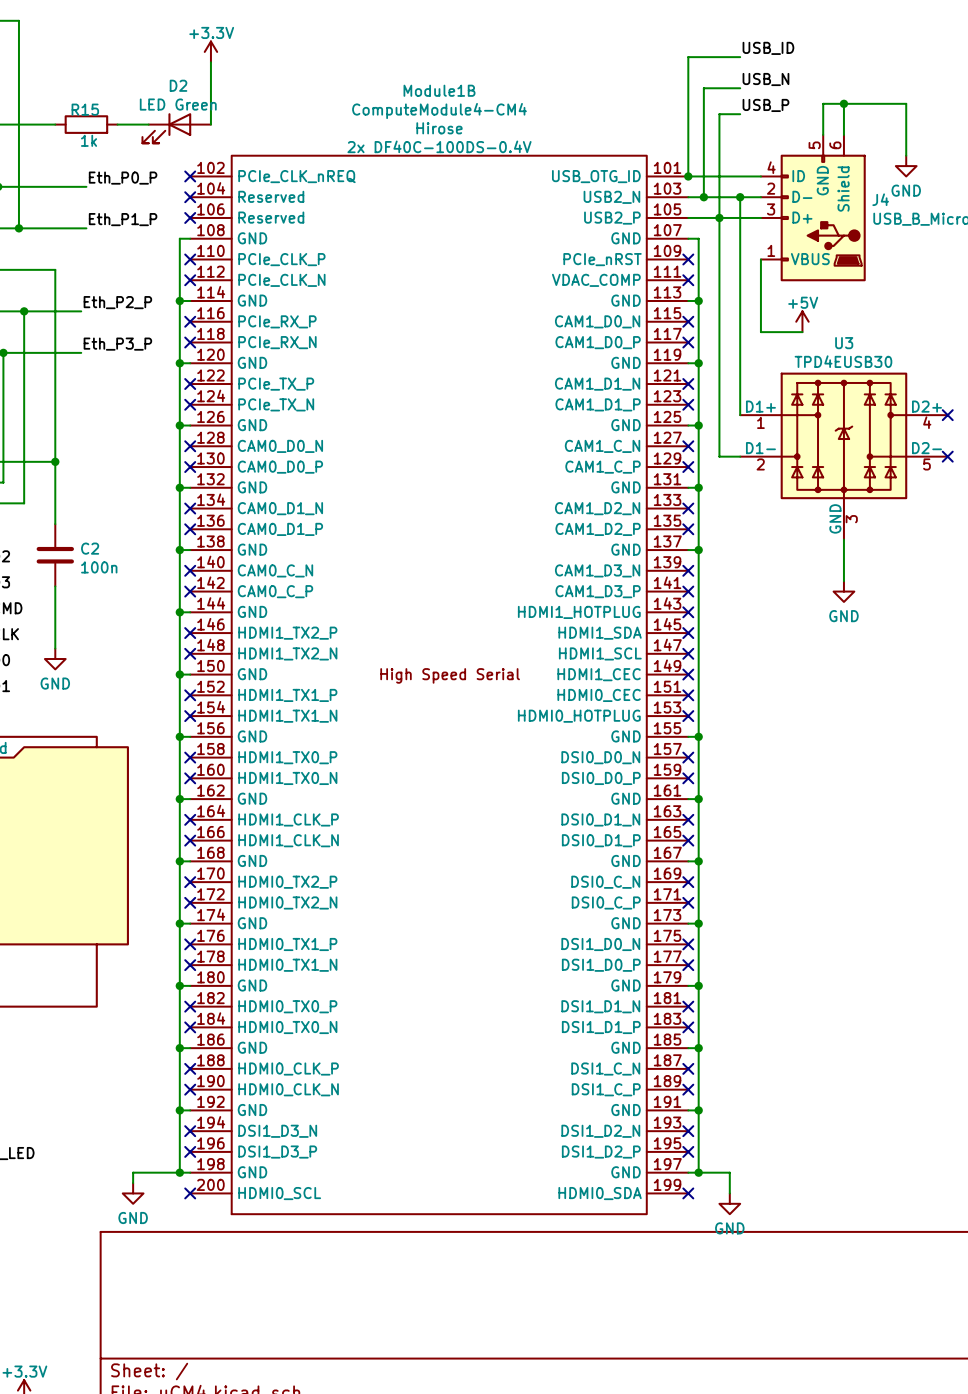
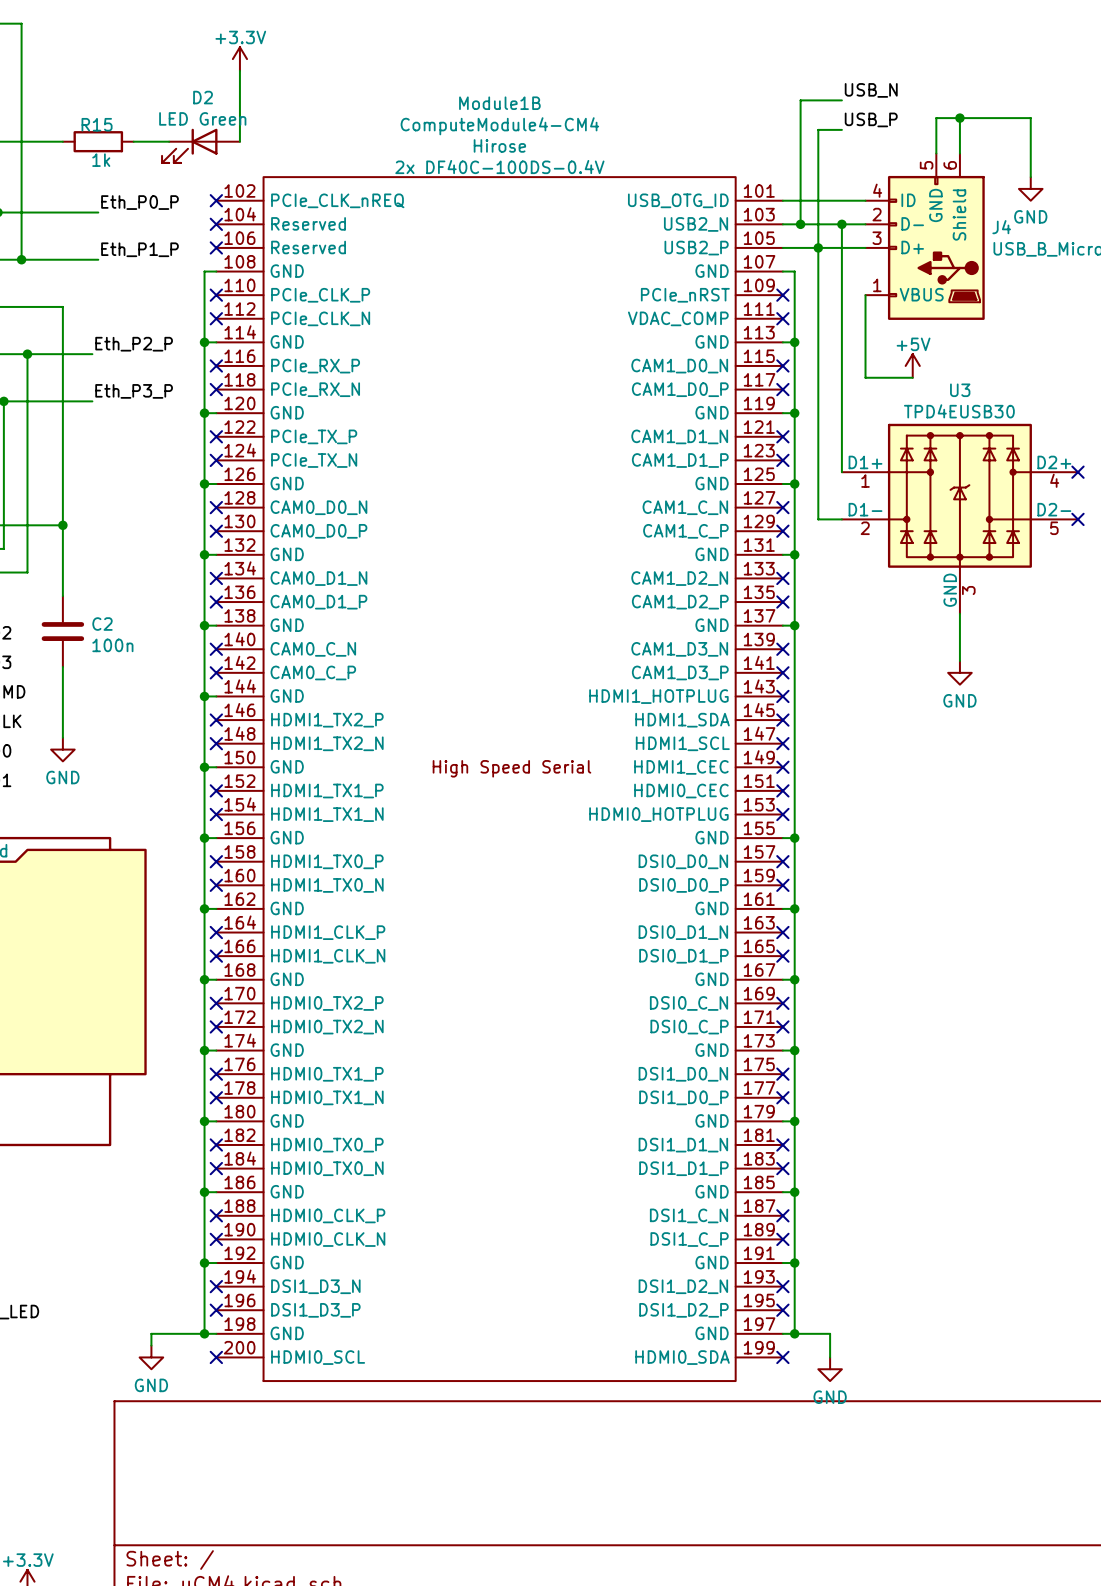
label: USB_ID (768, 48) -> none
wire: (740, 57) (688, 57) (688, 176) -> none
junction: (688, 176) -> none

